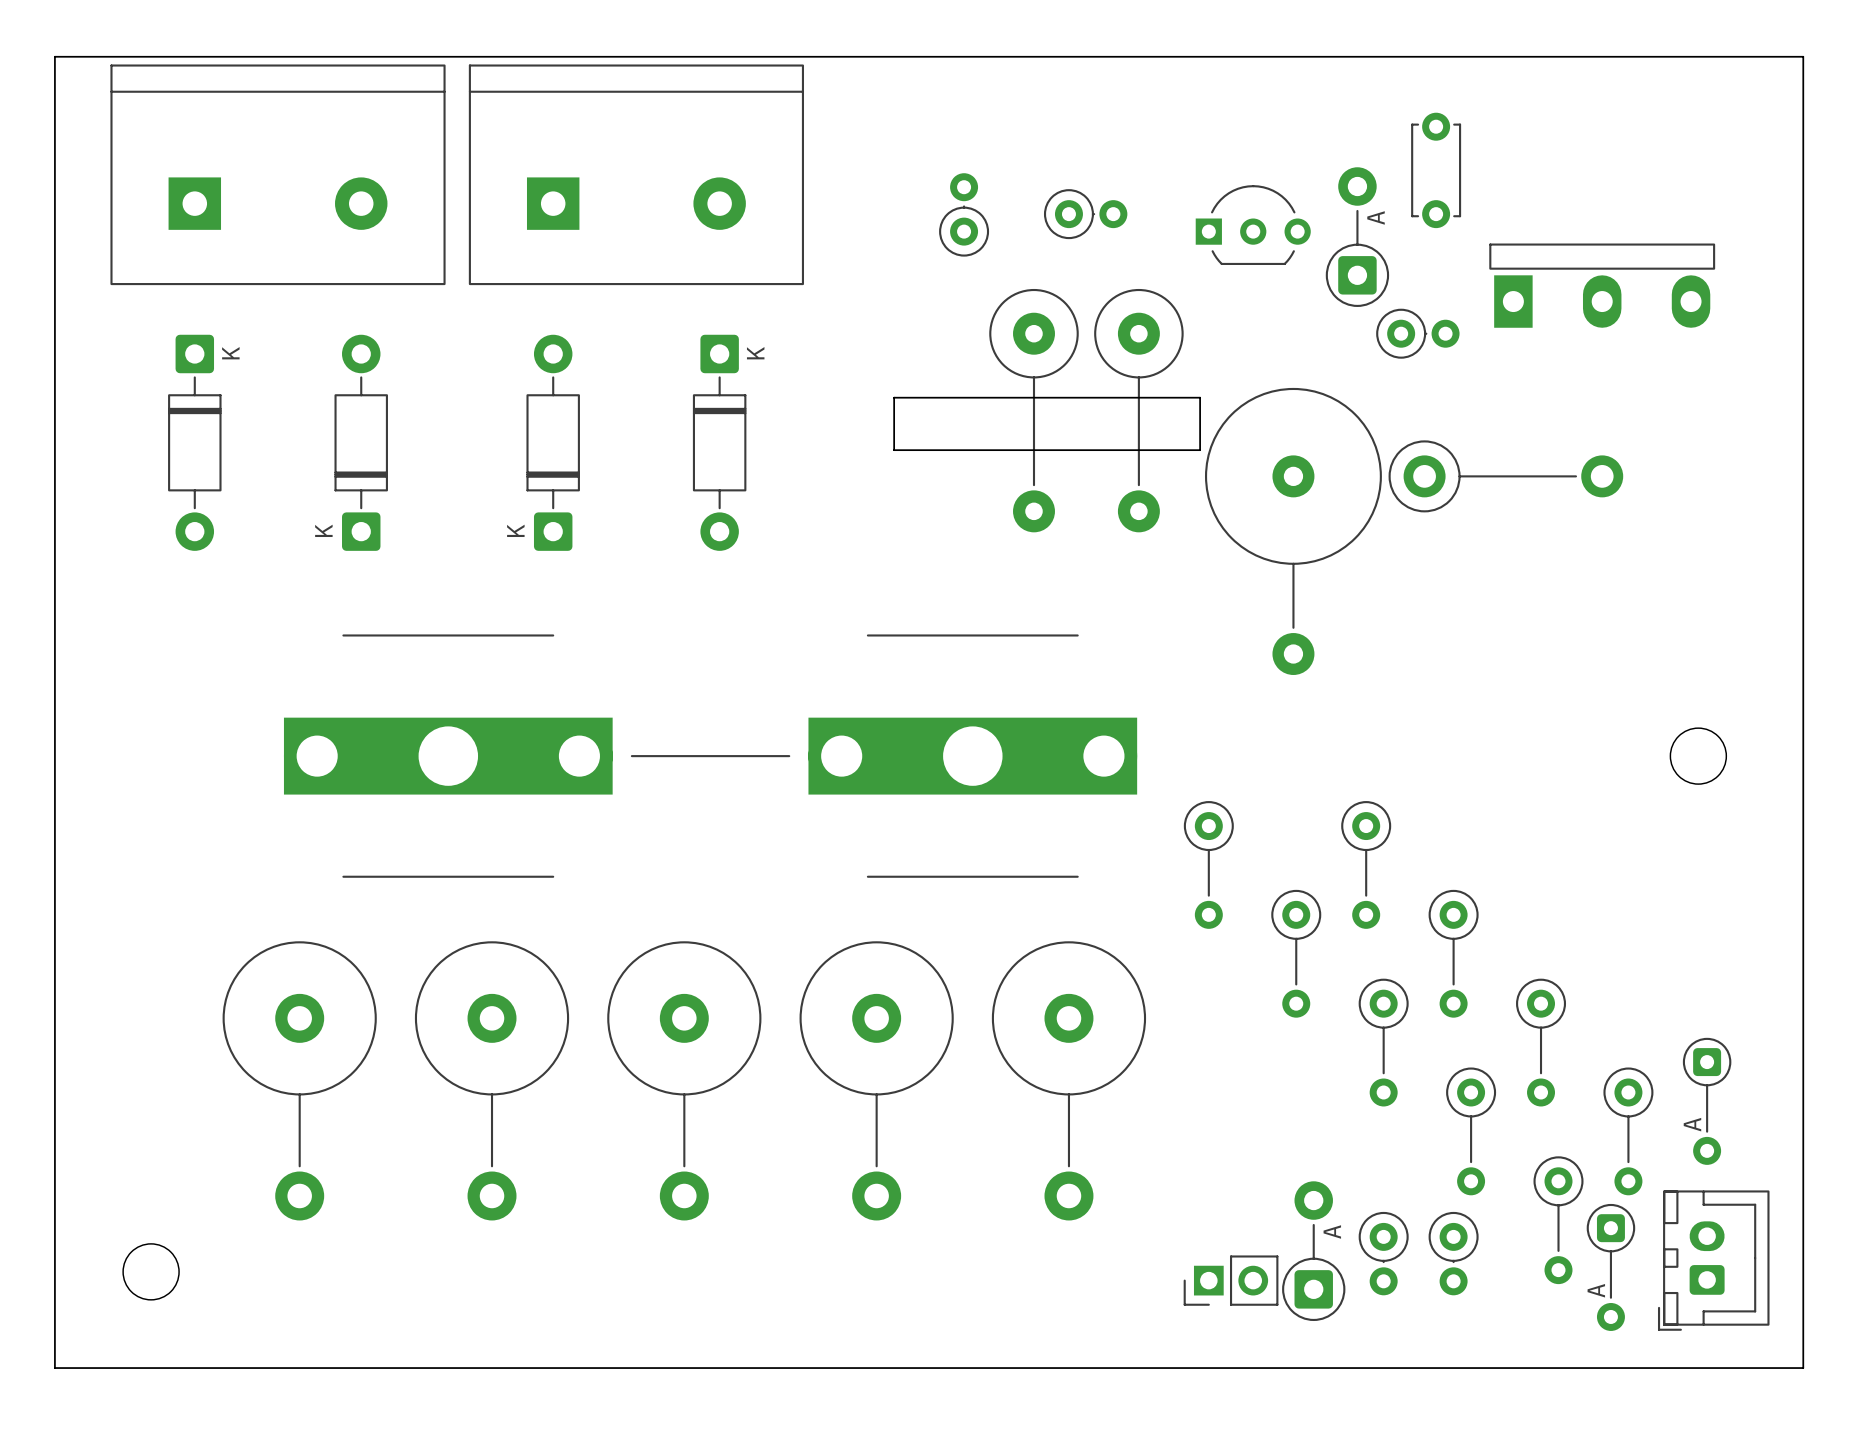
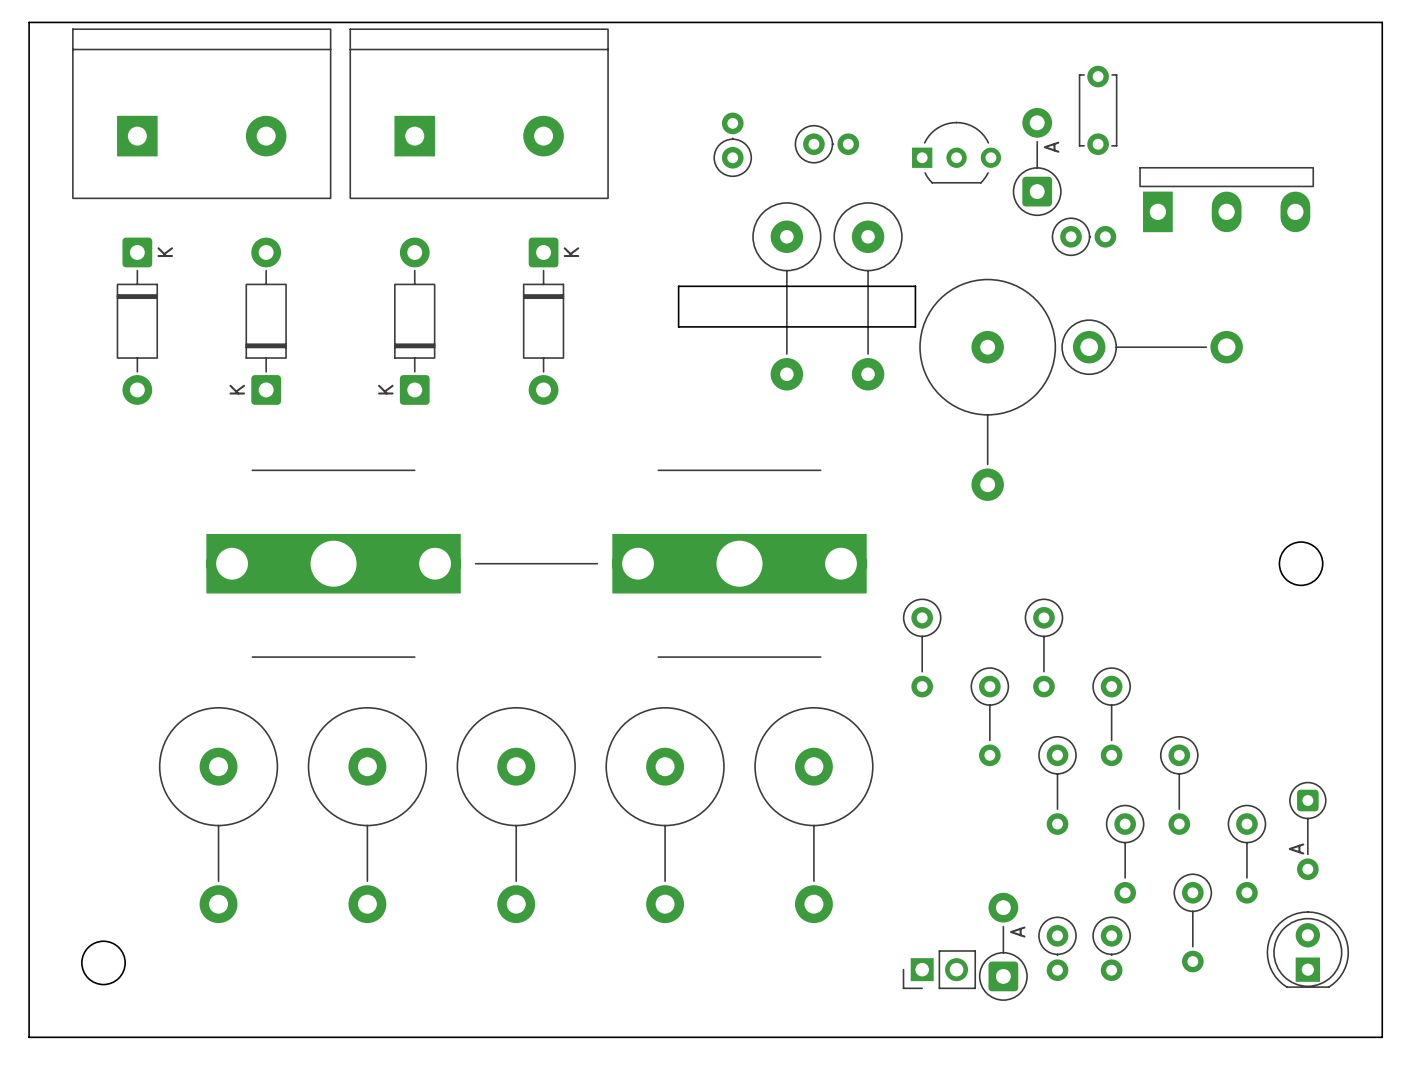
part footprint: [1657, 1190, 1770, 1331] -> [1266, 911, 1350, 988]
part: (1610, 1267) -> none

